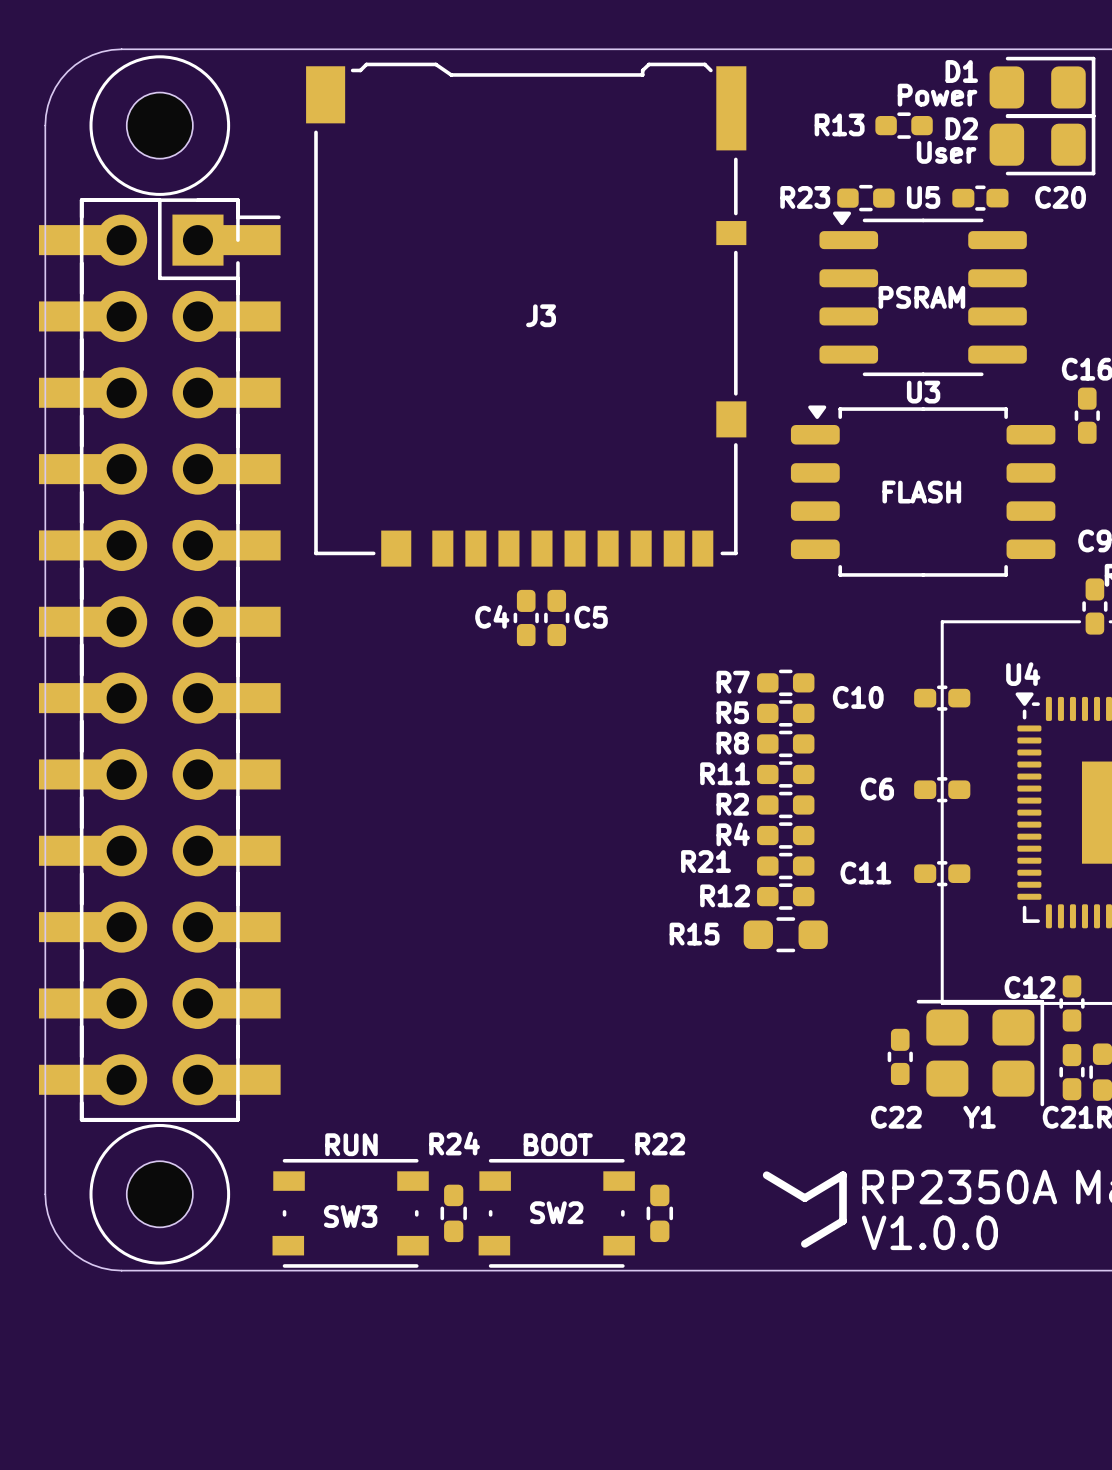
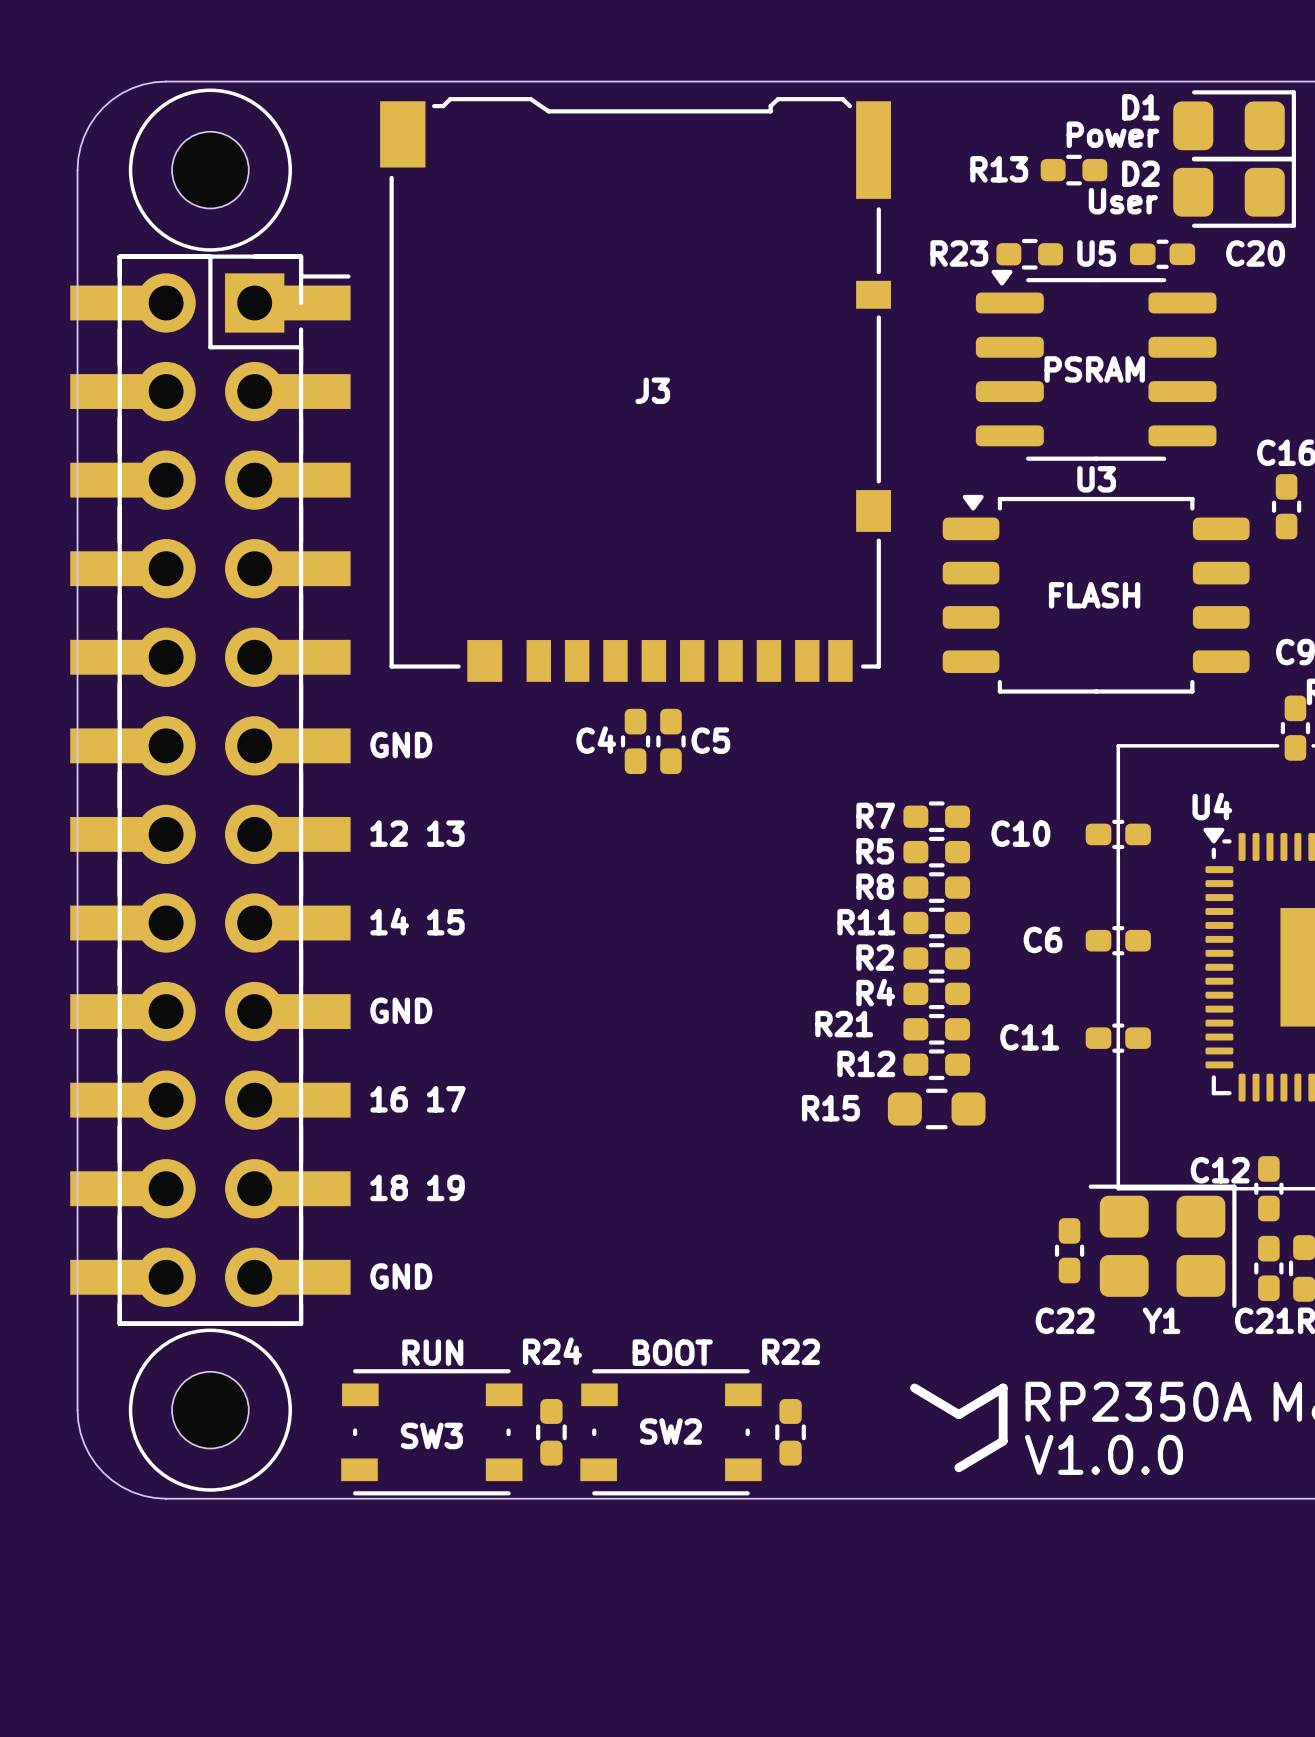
text: none -> GND (401, 745)
text: none -> 12 13 (417, 833)
text: none -> 14 15 (417, 921)
text: none -> GND (401, 1010)
text: none -> 16 17 (418, 1099)
text: none -> 18 19 (417, 1187)
text: none -> GND (401, 1276)

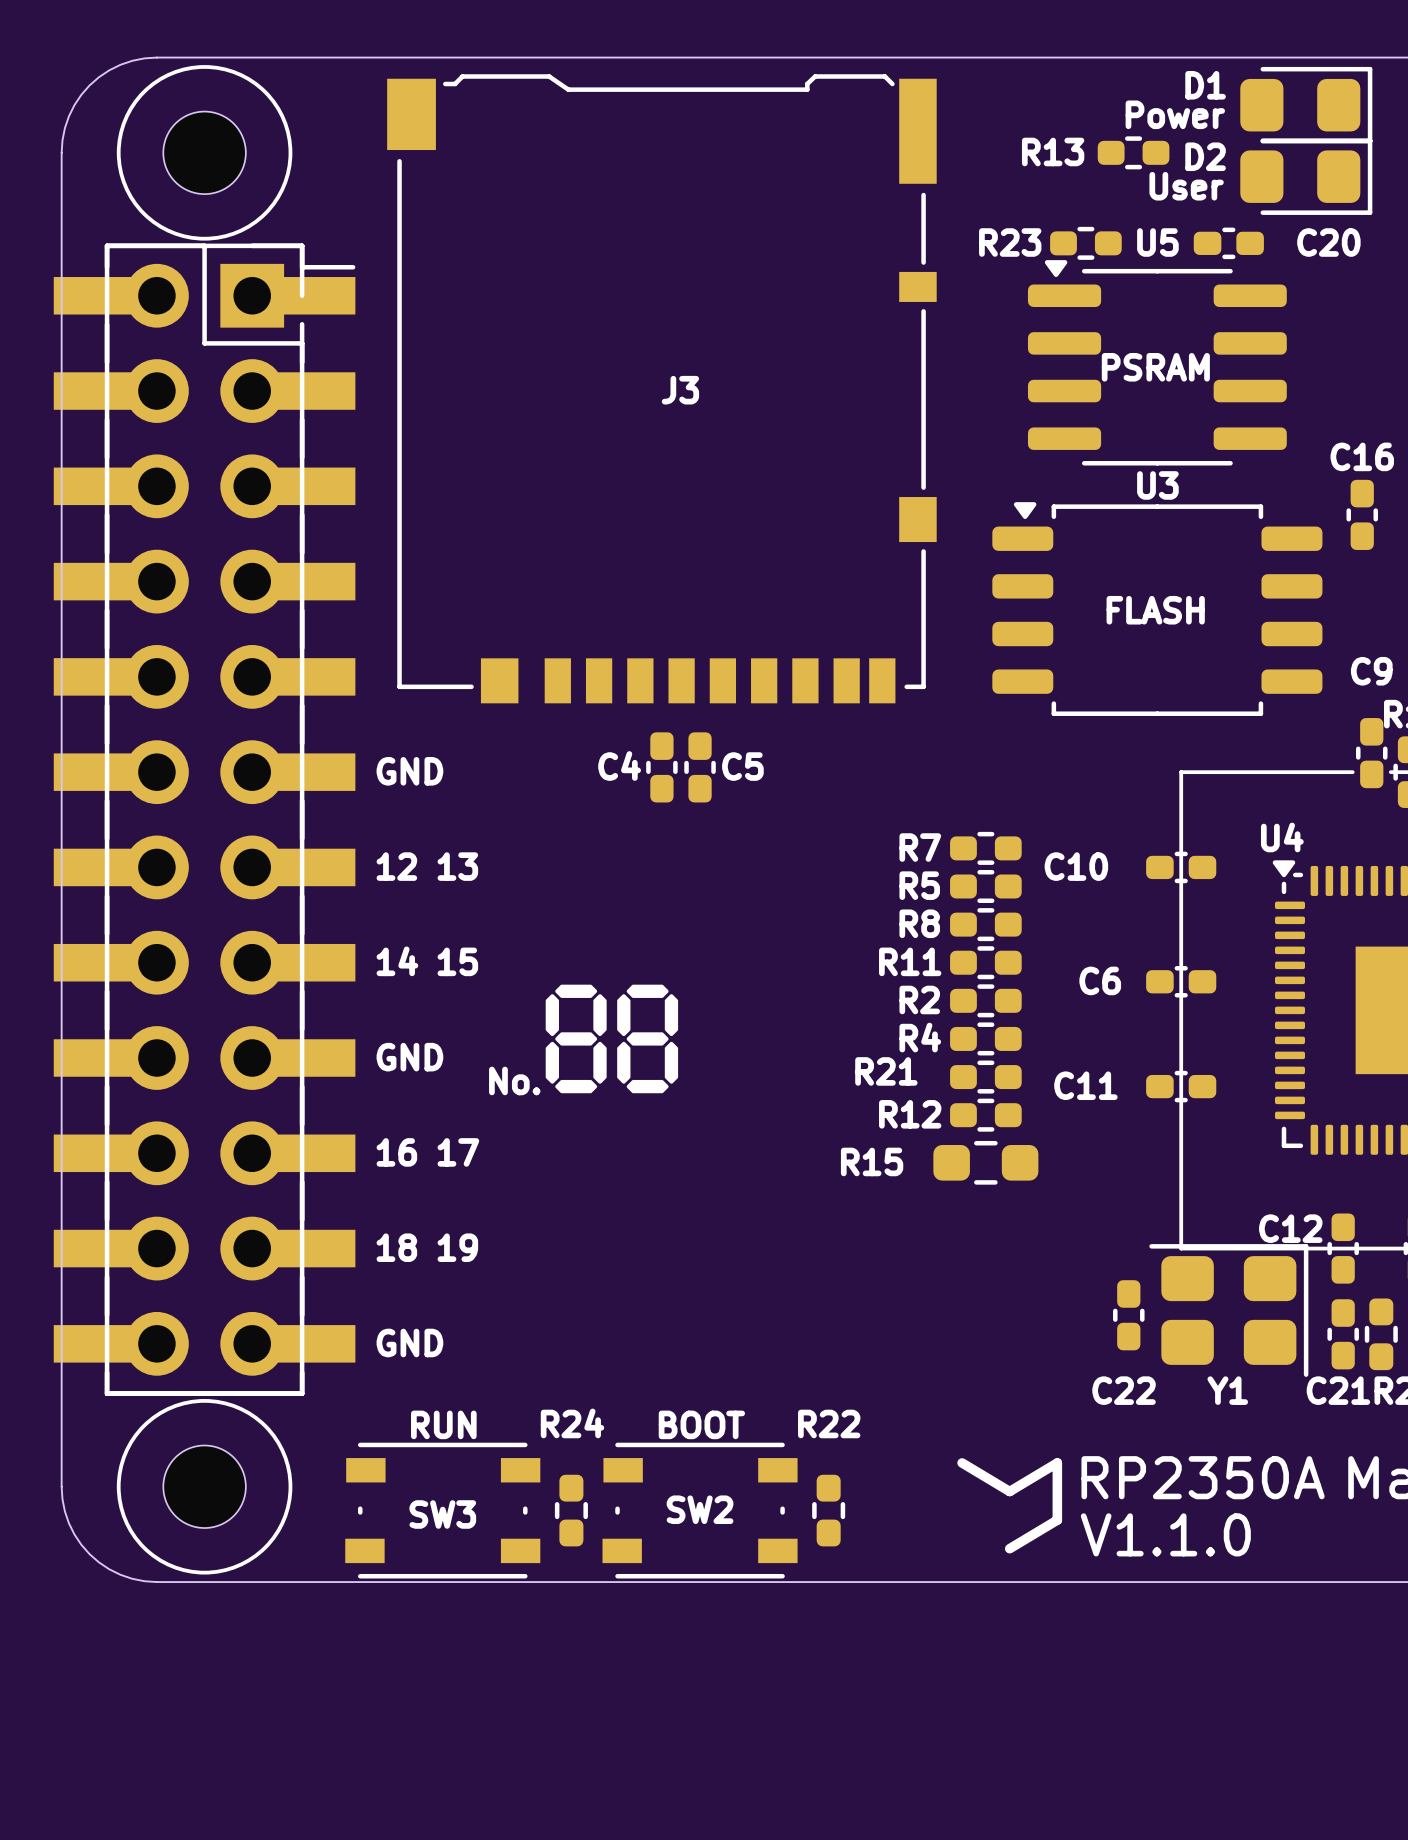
drawing: none -> [545, 984, 679, 1094]
text: none -> No. (514, 1080)
text: V1.0.0 (1104, 1454) -> V1.1.0 (1165, 1534)

